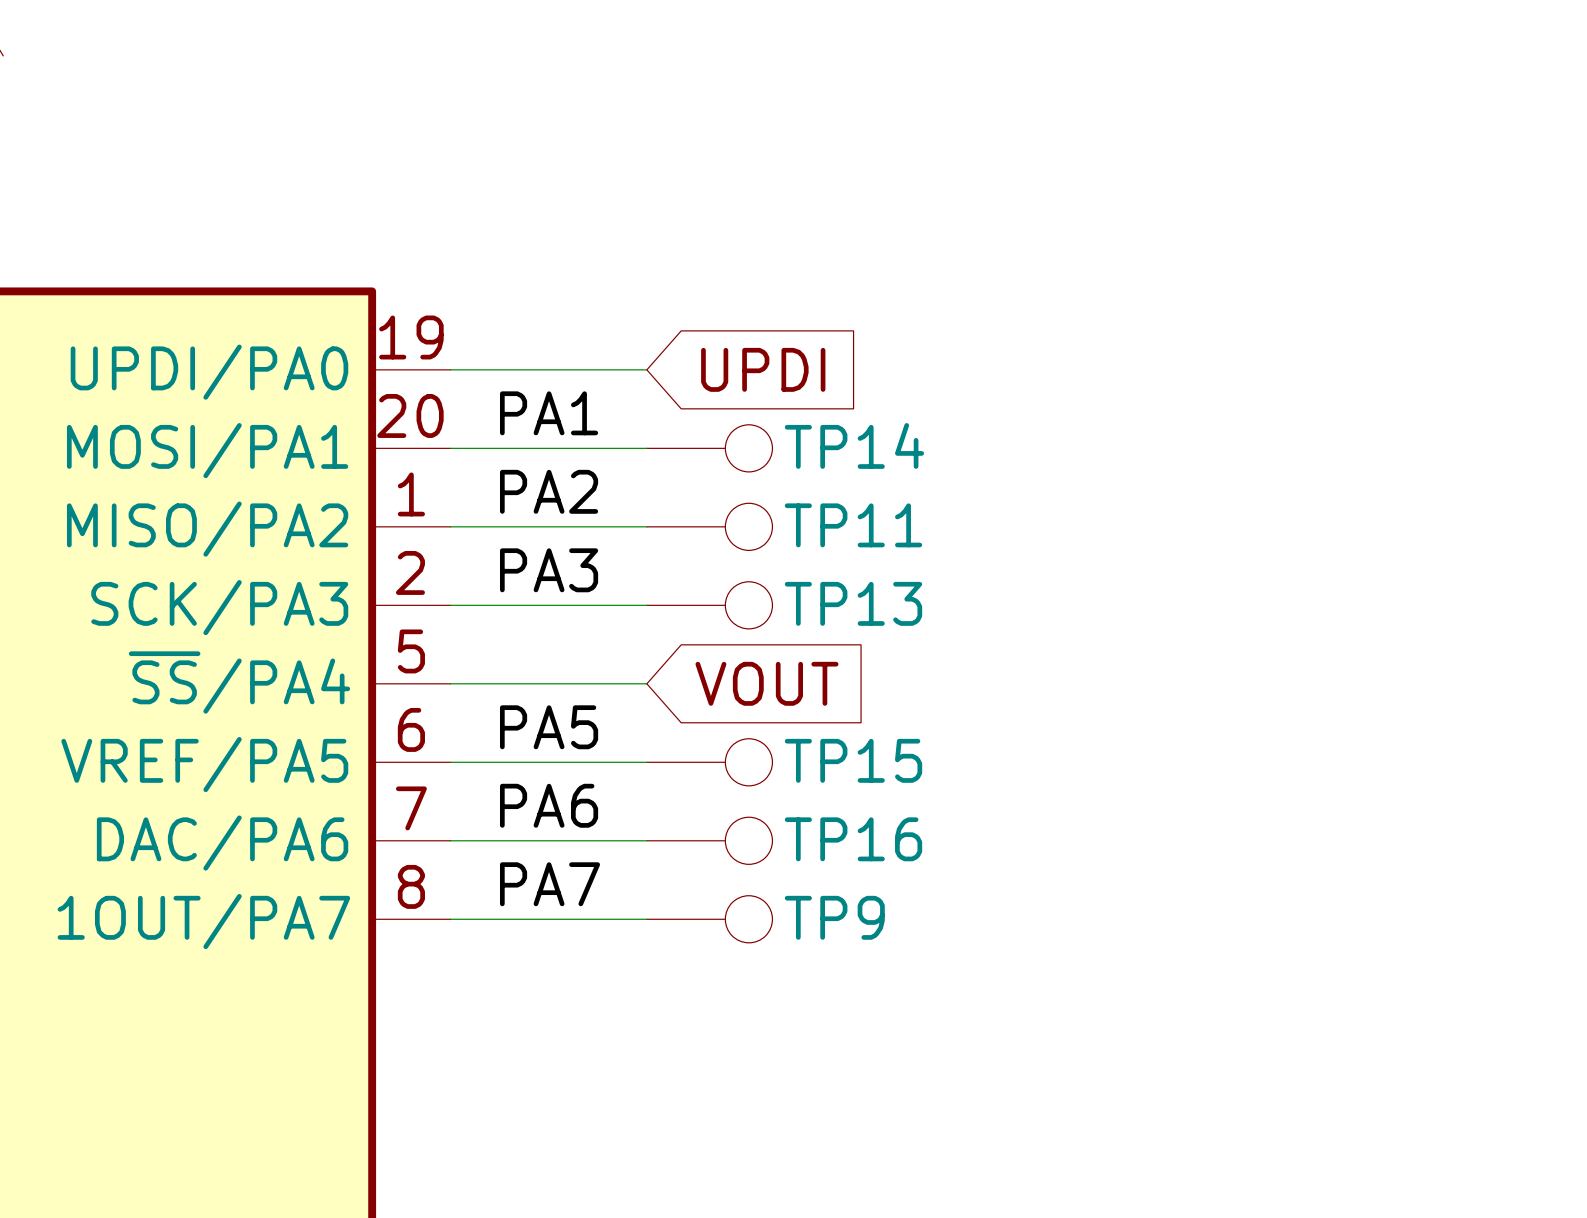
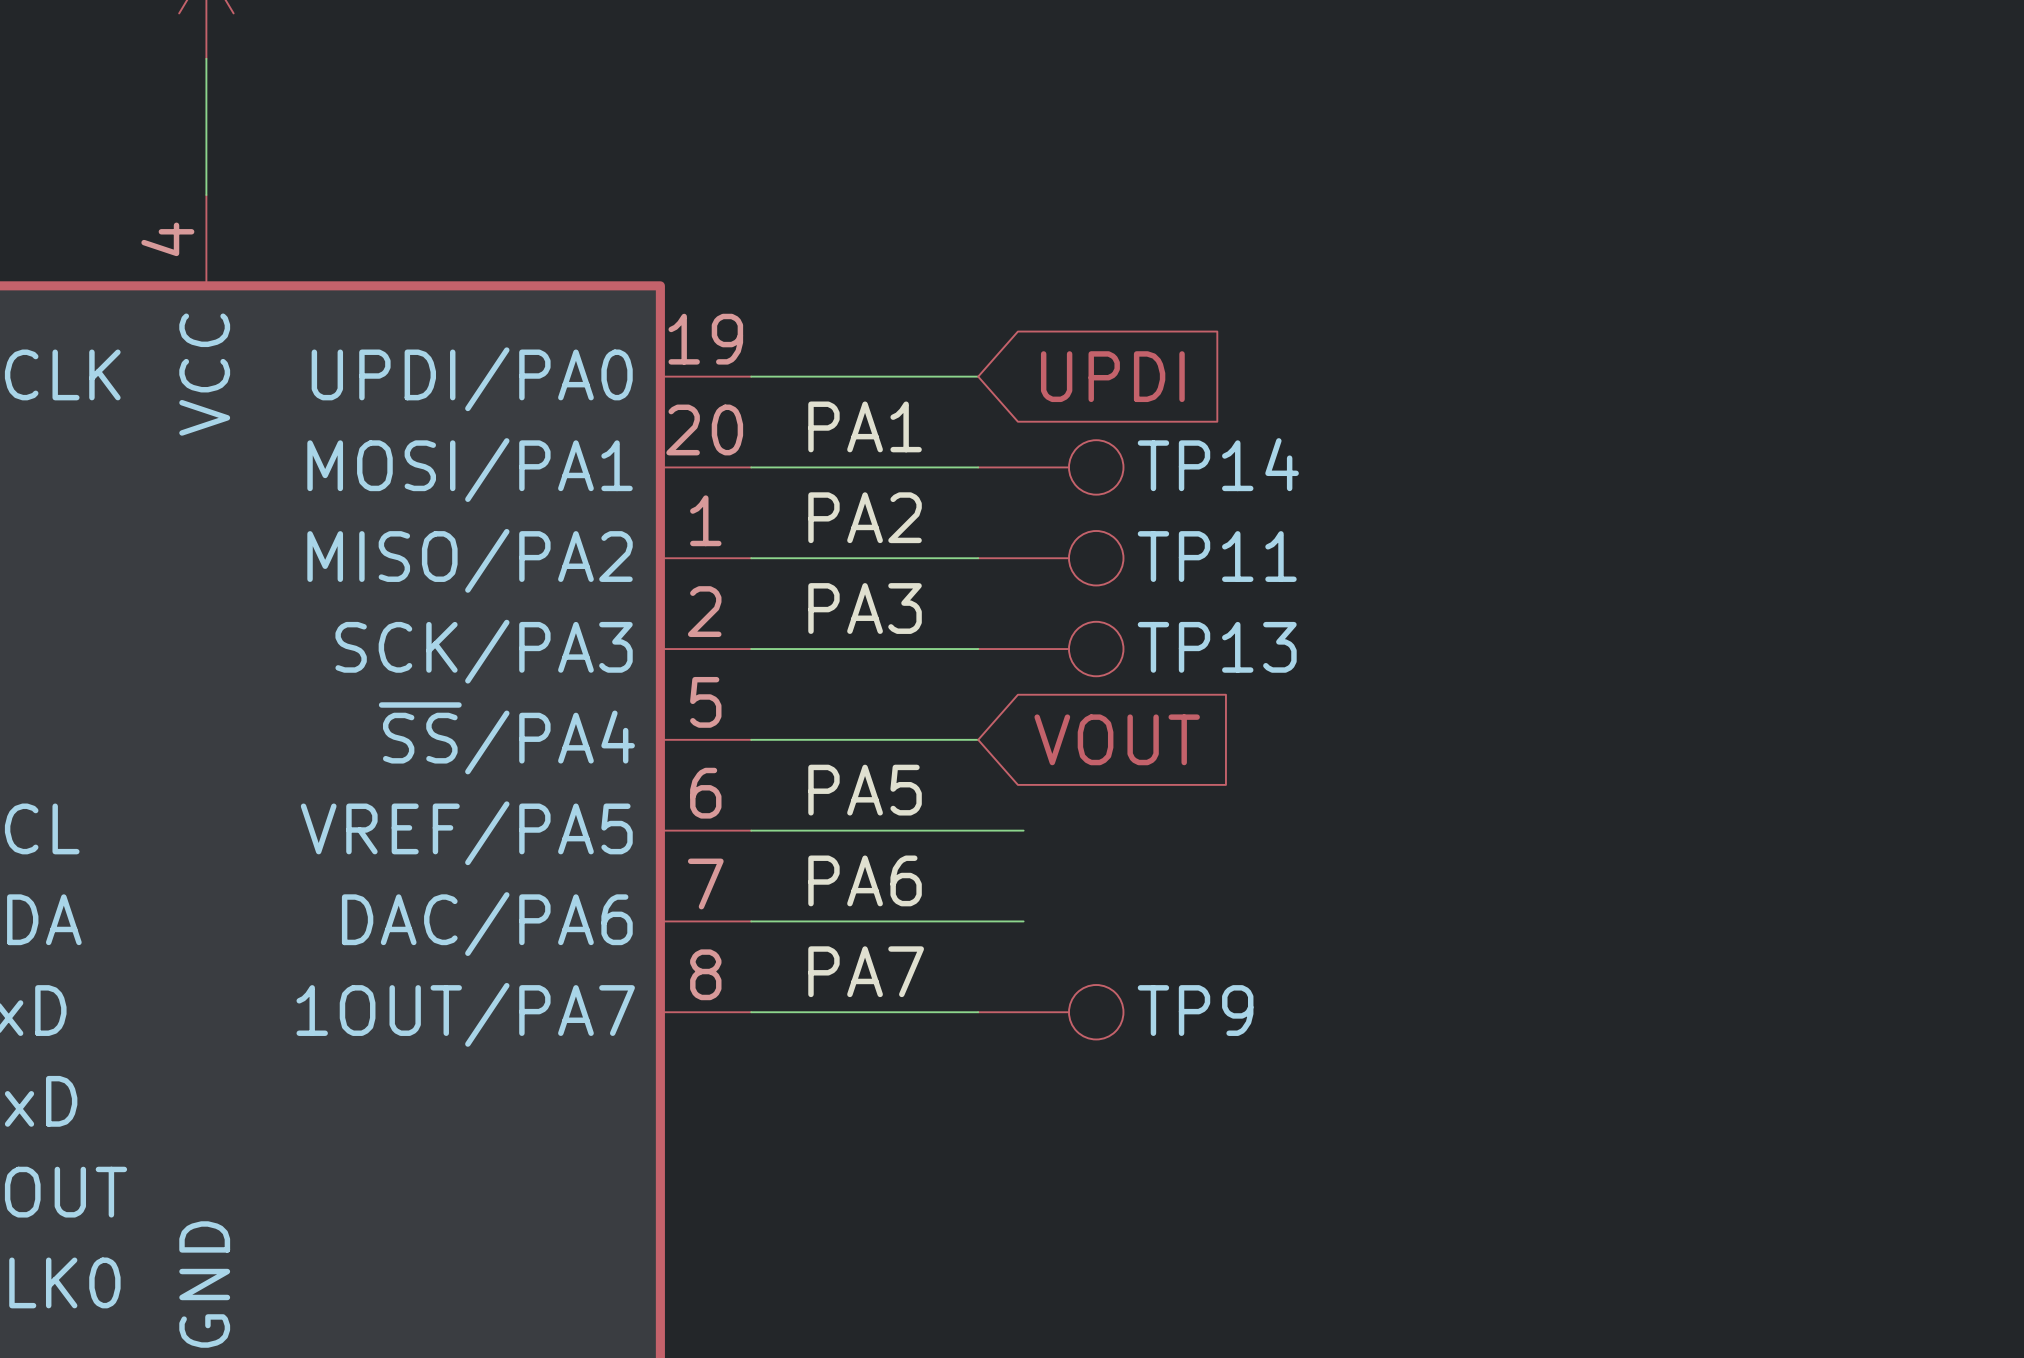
TP15: (709, 762) -> none
TP16: (709, 840) -> none

